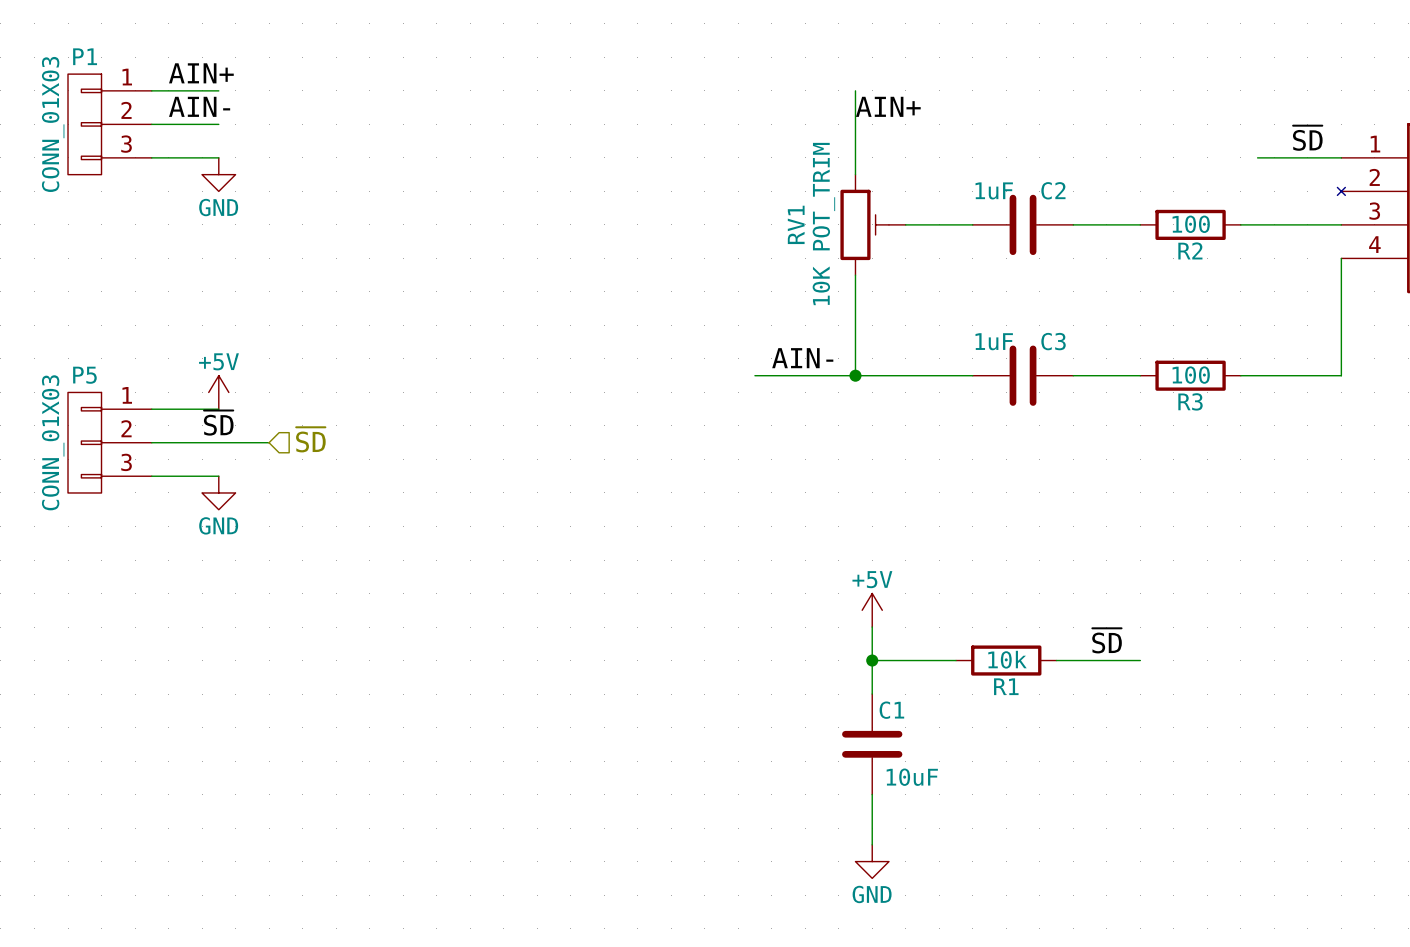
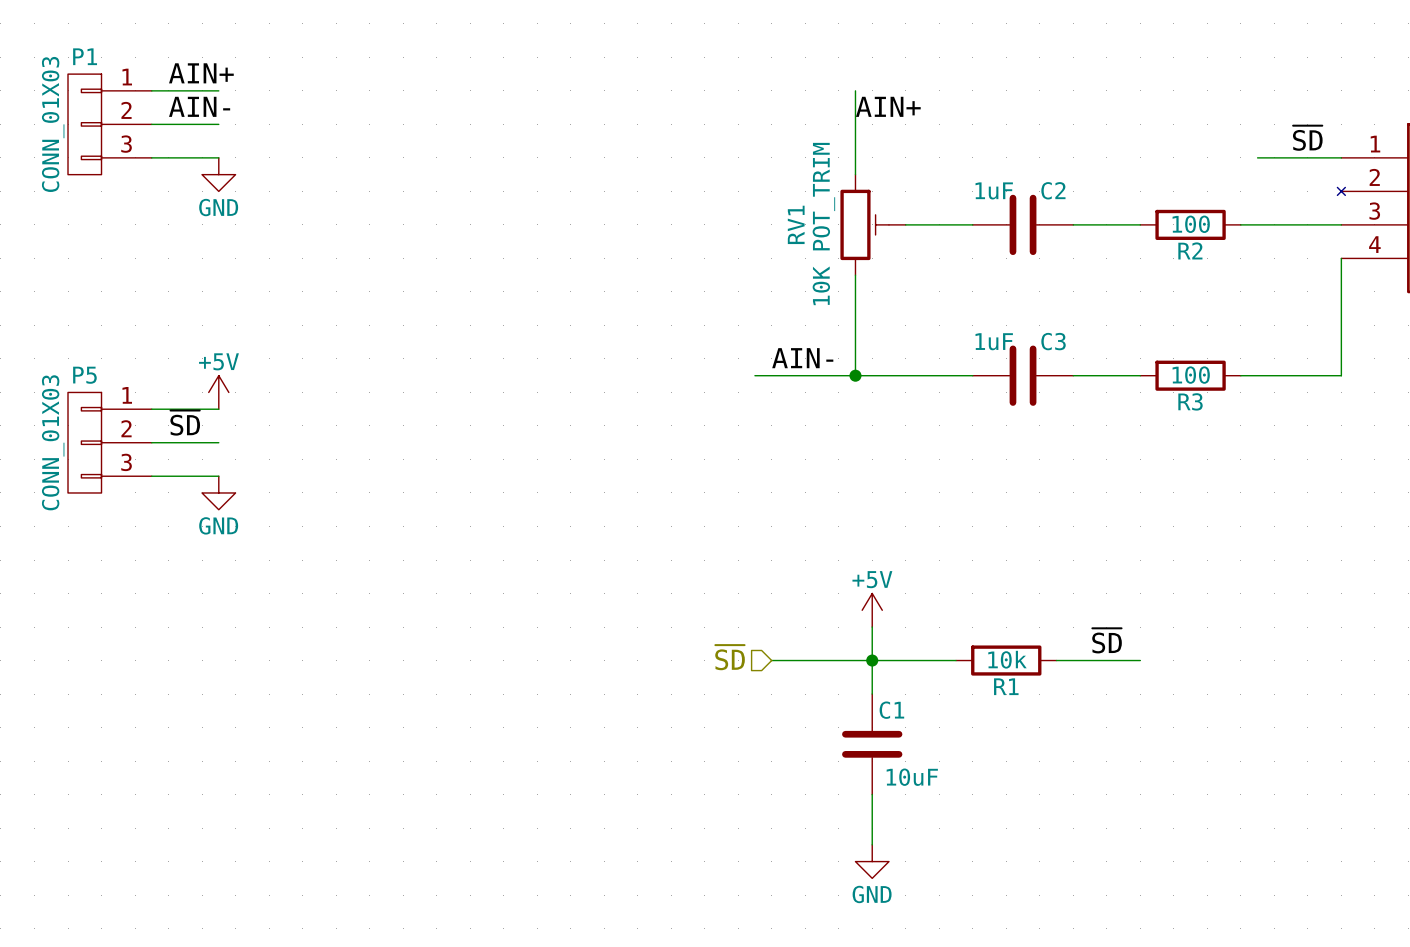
label position: ~{SD} (218, 423) -> ~{SD} (185, 423)
hierarchical label: ~{SD} (310, 439) -> none
wire: (218, 442) (269, 442) -> none
hierarchical label: none -> ~{SD} (730, 657)
wire: none -> (771, 660) (872, 660)

